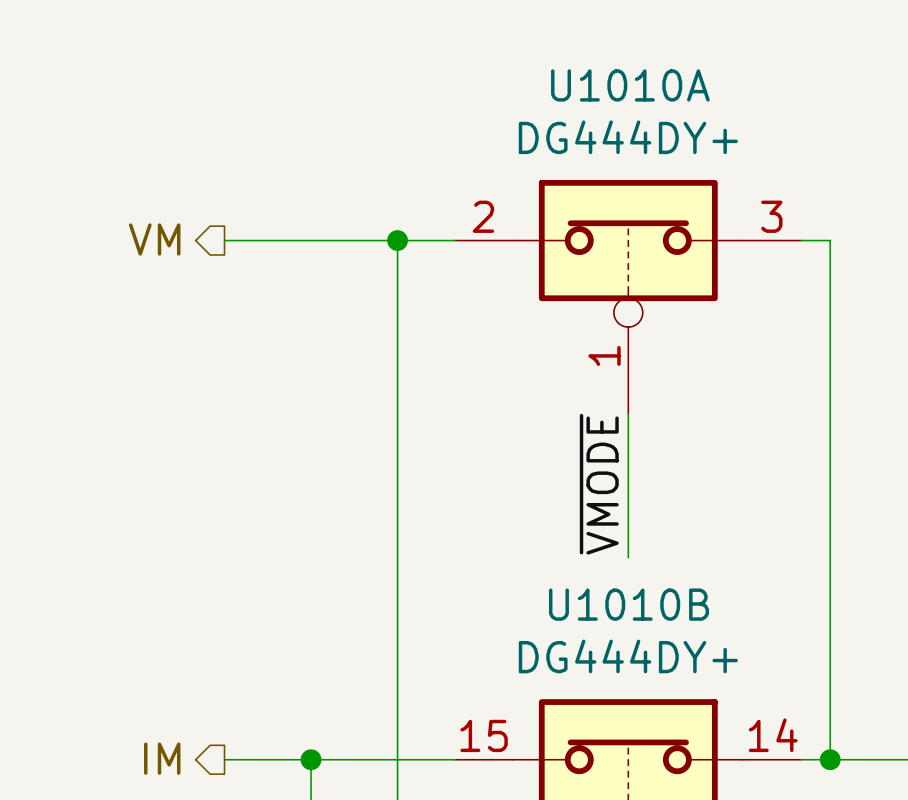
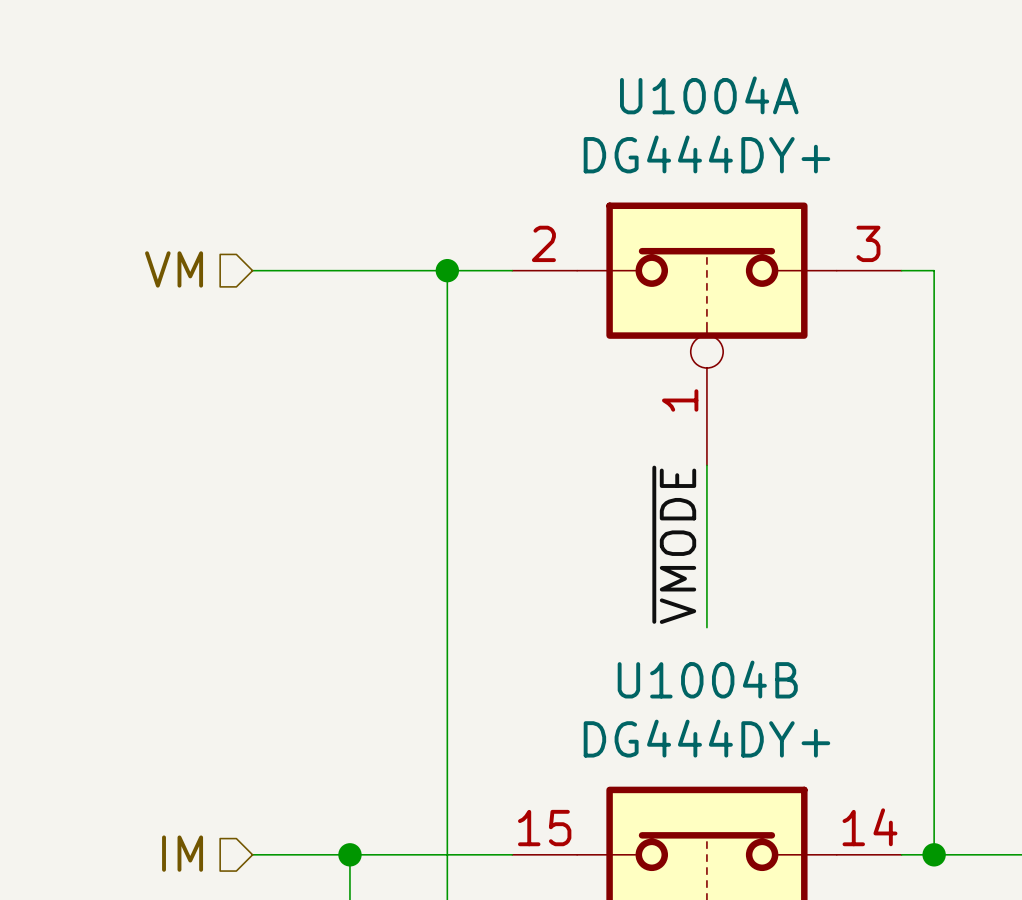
U1010A name: U1010A (630, 85) -> U1004A (709, 95)
hierarchical label shape: output (154, 239) -> input (174, 269)
U1010B name: U1010B (629, 604) -> U1004B (707, 679)
hierarchical label shape: output (162, 758) -> input (182, 853)

